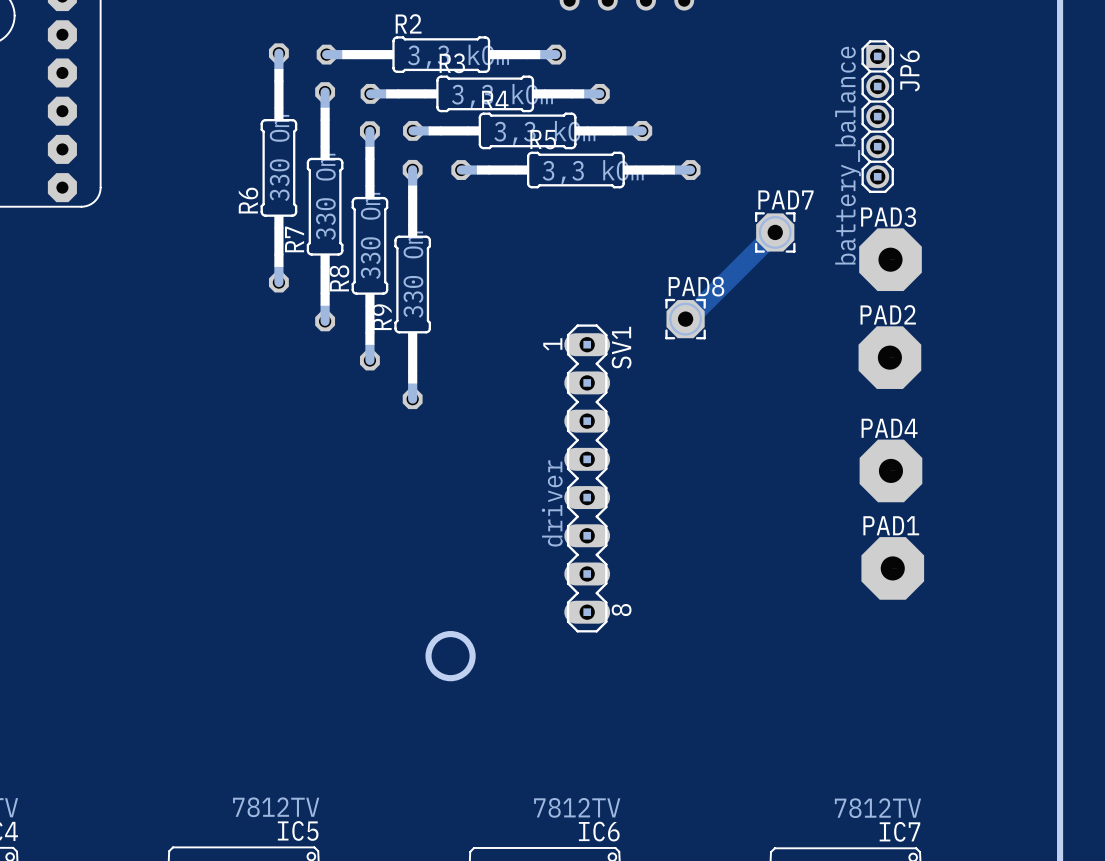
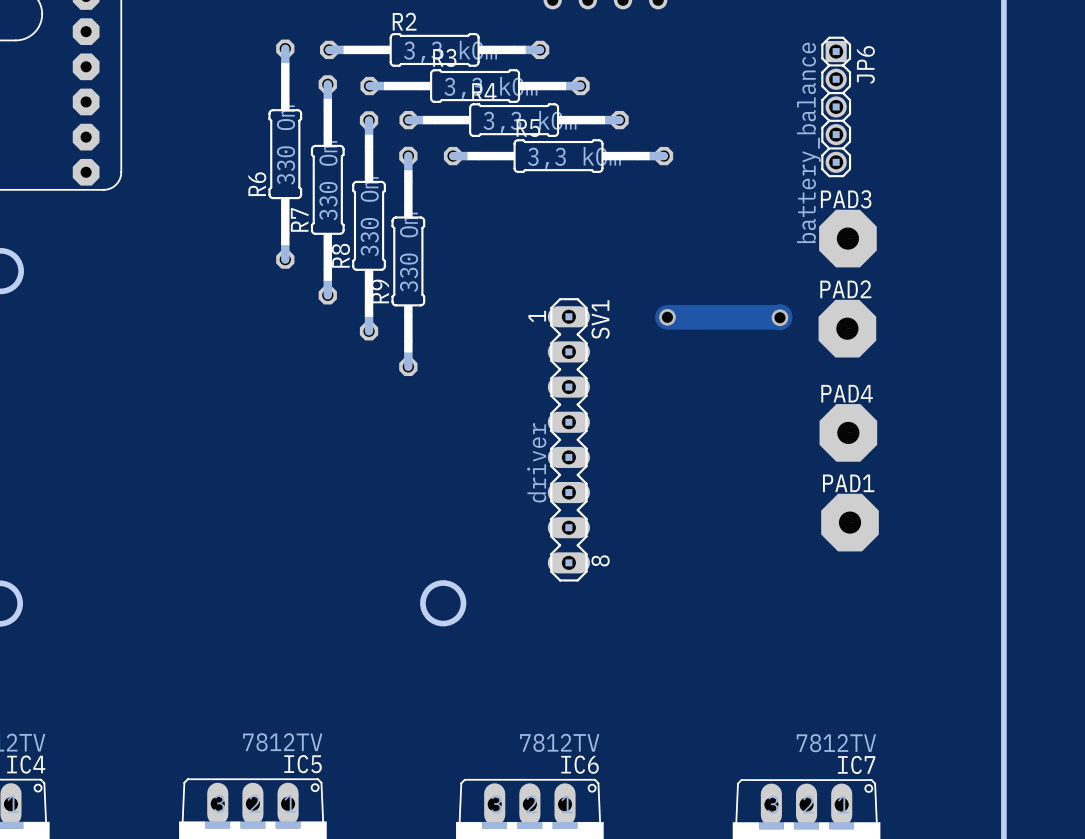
track: (775, 232) (688, 319) (685, 319) -> none
PAD7: (775, 232) -> none
PAD8: (685, 319) -> none
track: none -> (667, 317) (779, 317)
via: none -> (667, 317)
via: none -> (779, 317)

